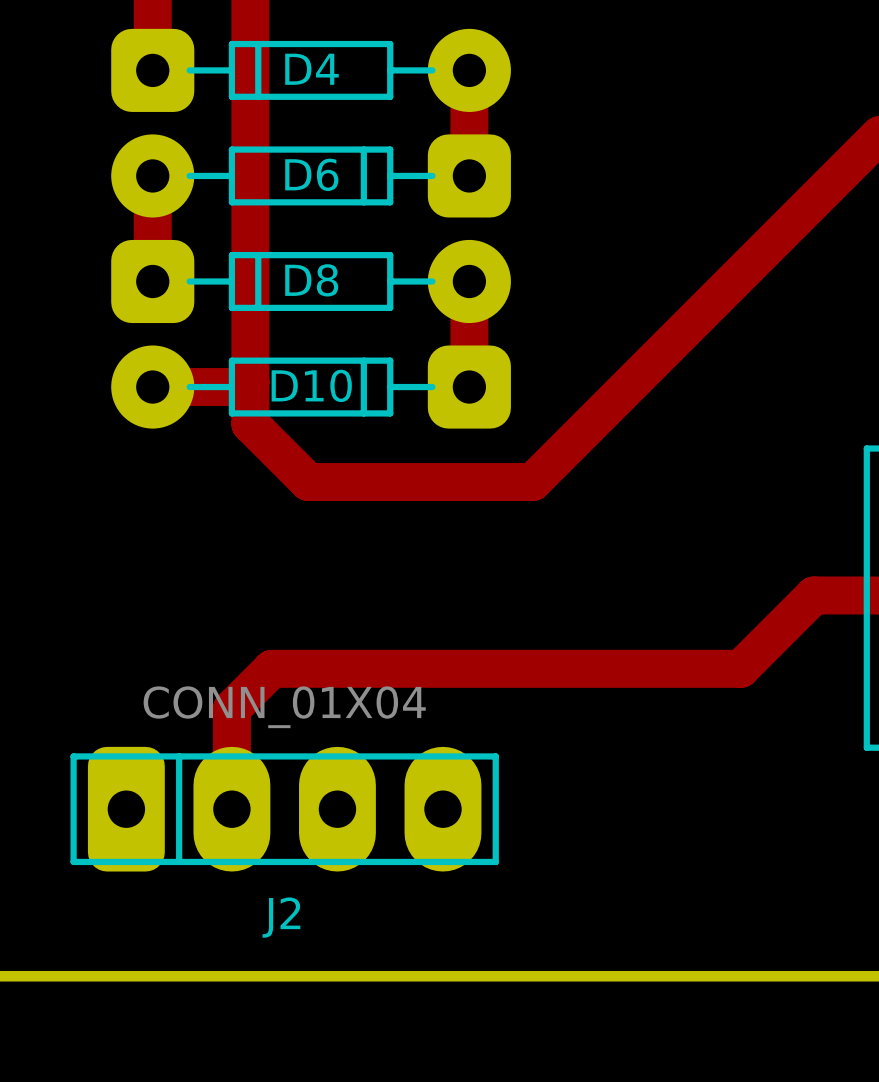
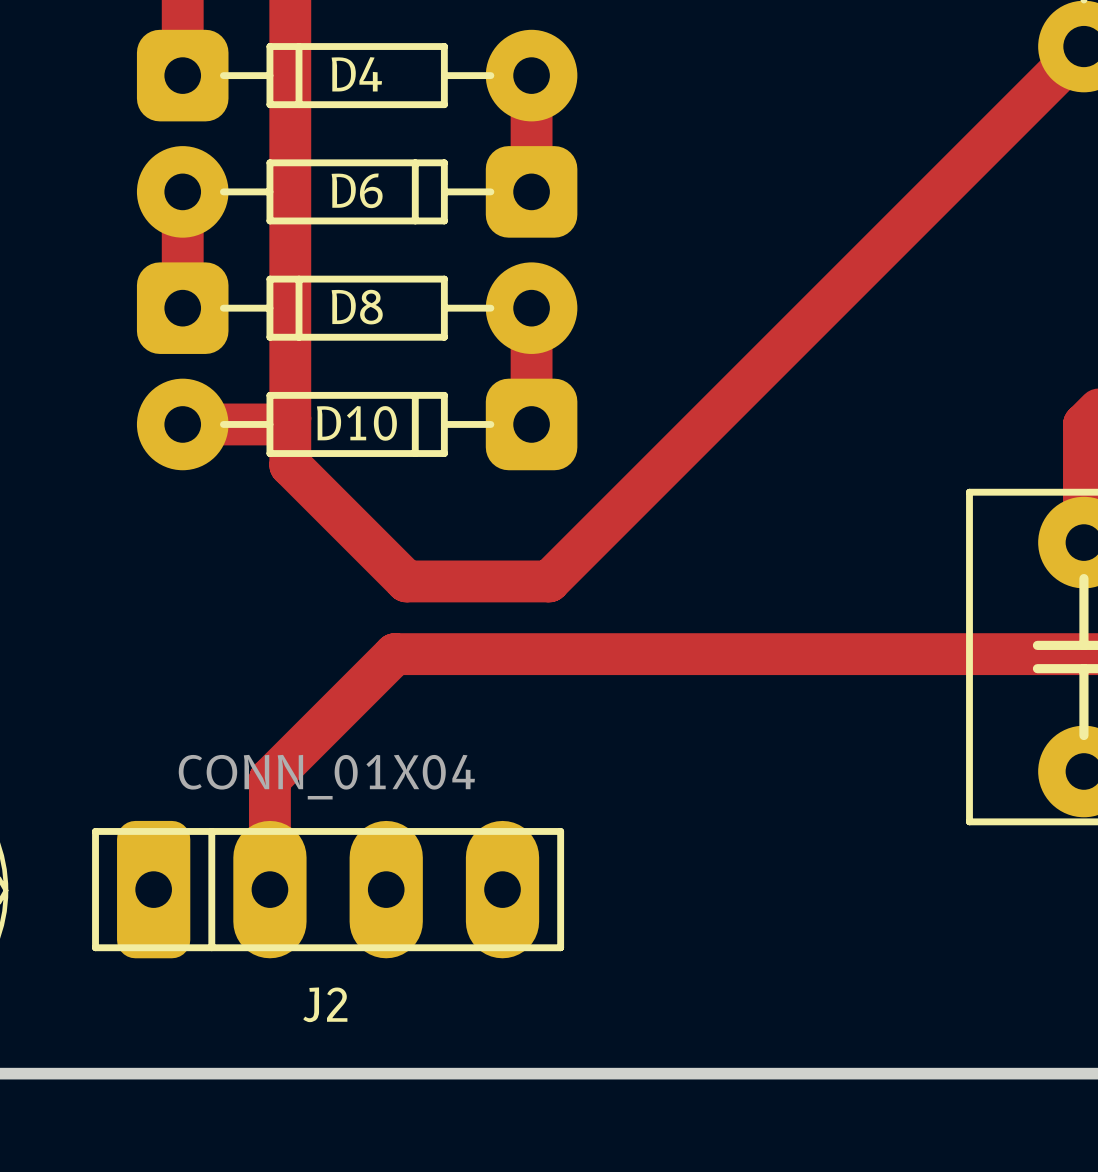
track: (308, 482) (532, 482) -> (354, 529) (406, 581) (549, 581) (601, 529)
track: (813, 595) (740, 668) (272, 668) -> (911, 654) (394, 654) (314, 734)
J2 footprint: [70, 746, 499, 872] -> [92, 820, 565, 959]

